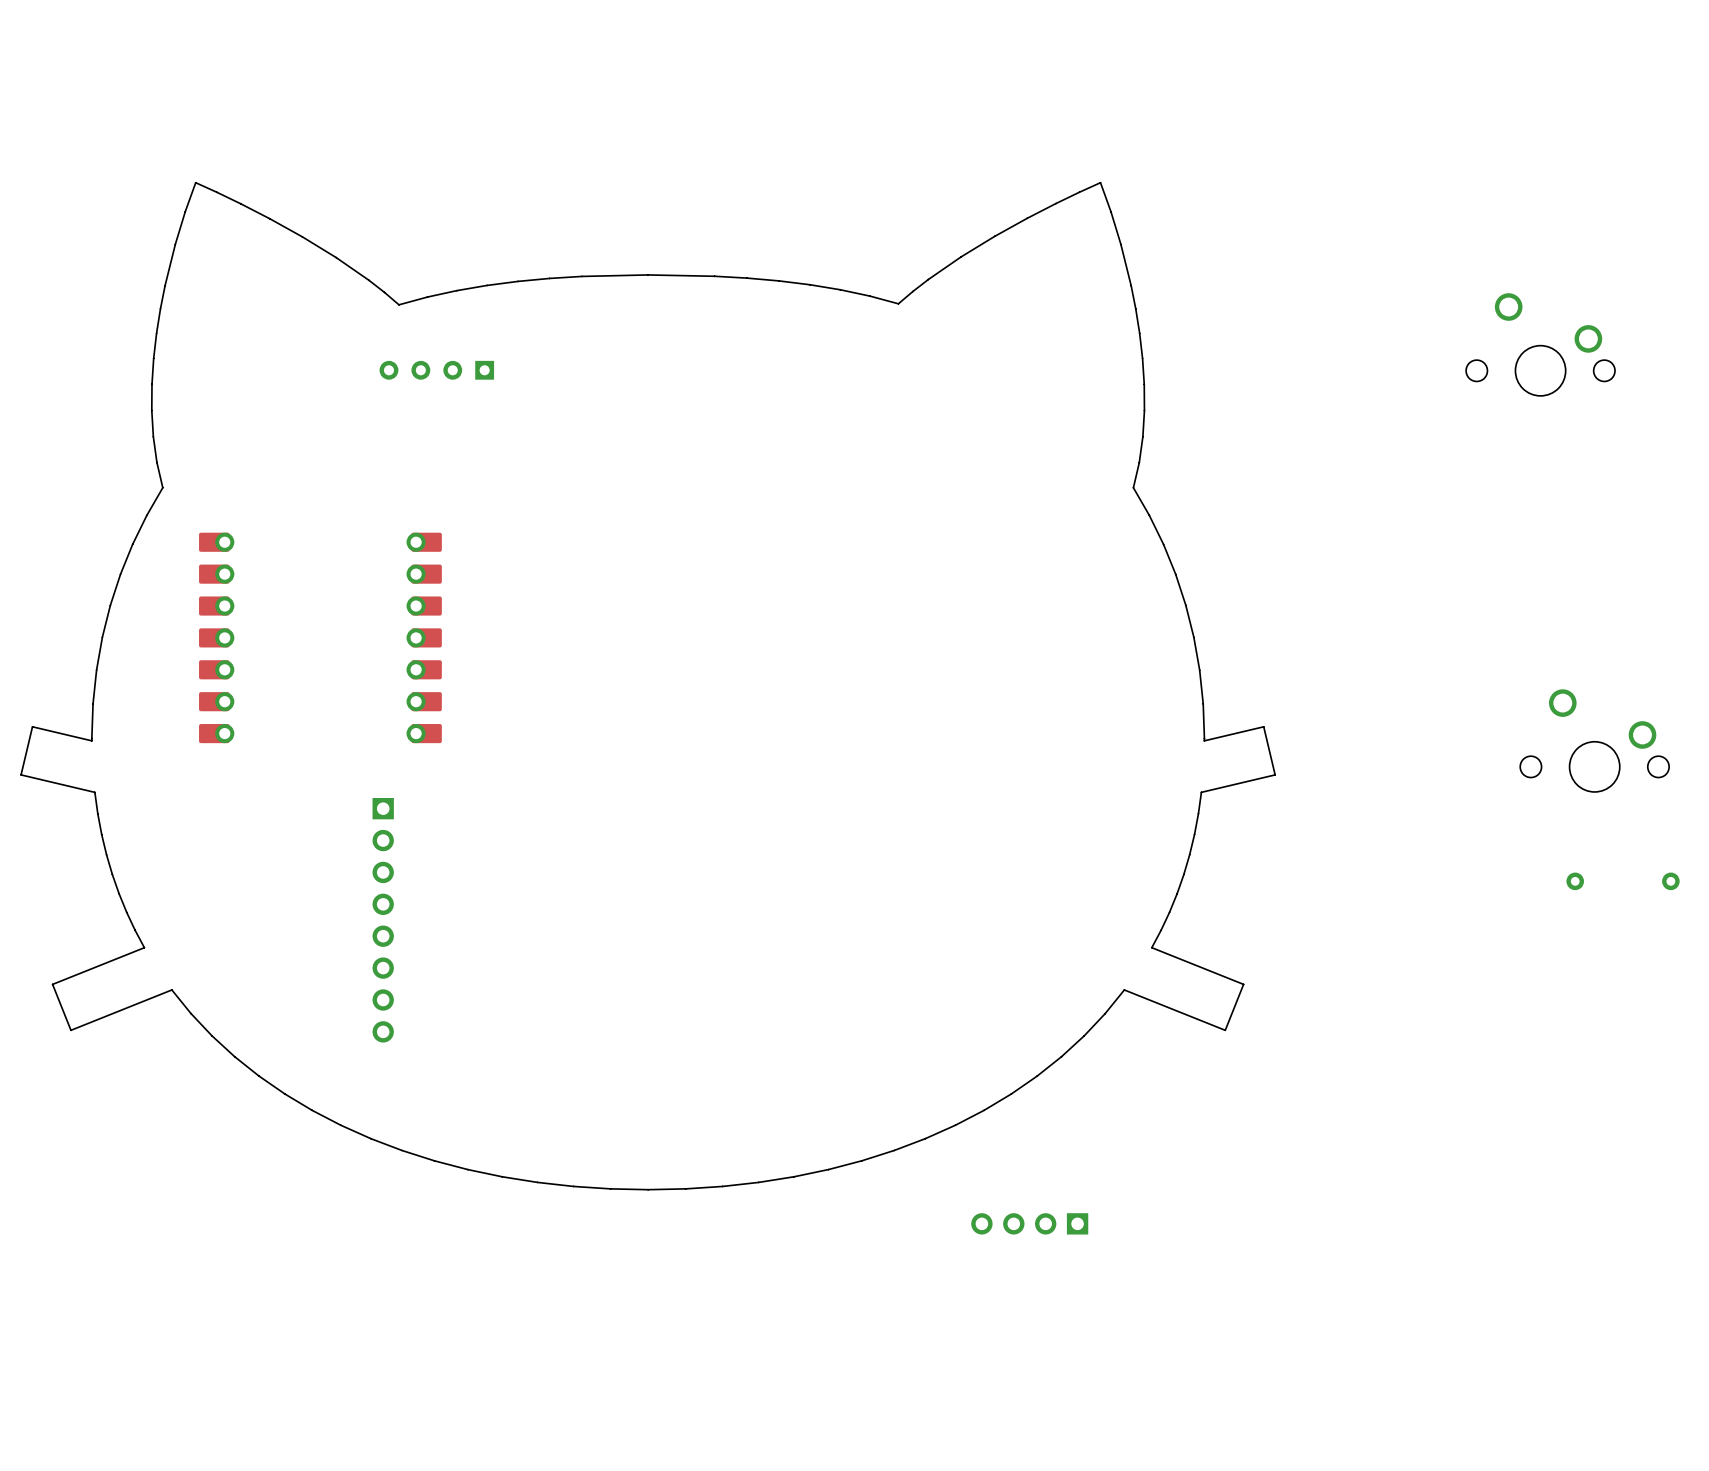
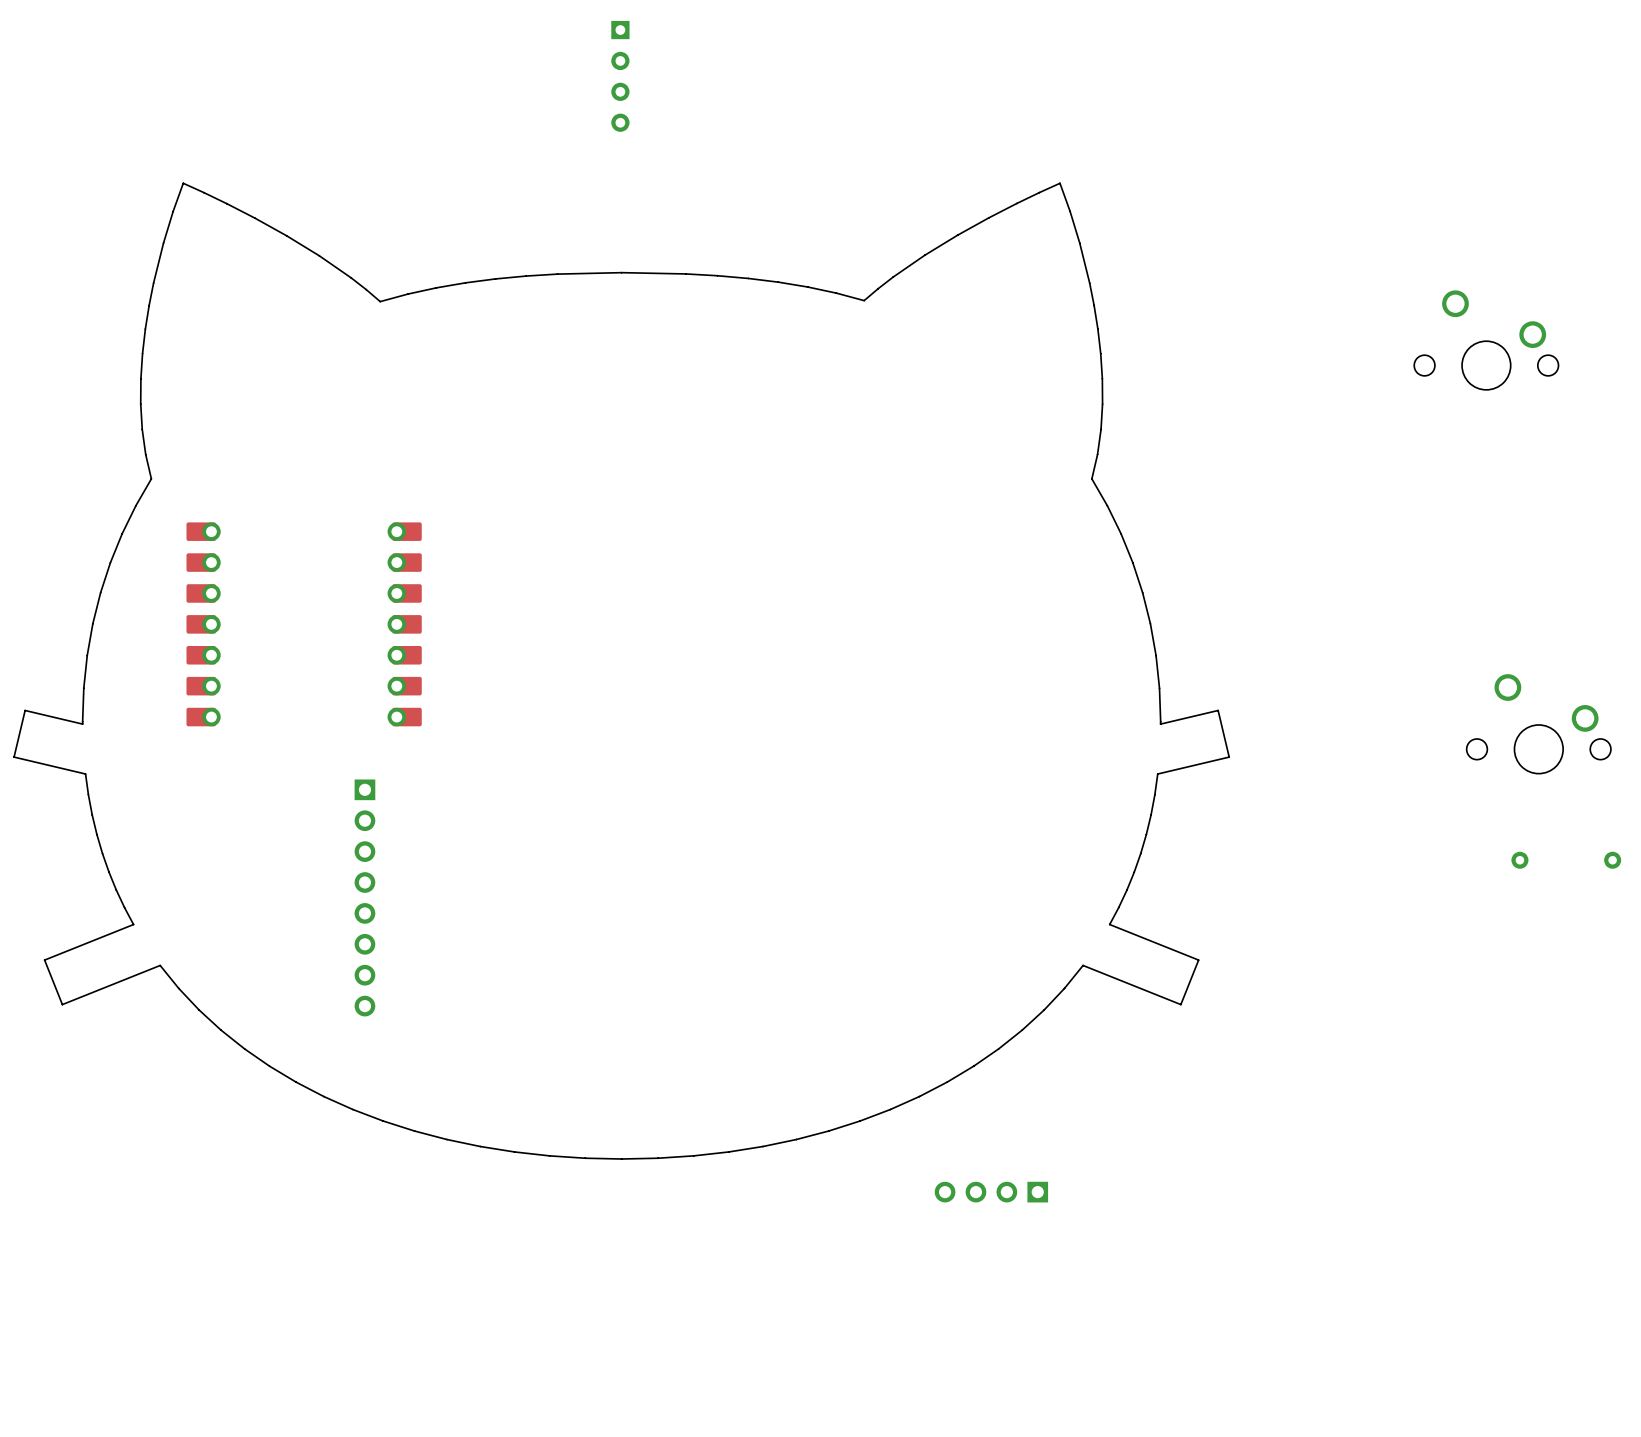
part: none -> (620, 76)
part: (436, 370) -> none

